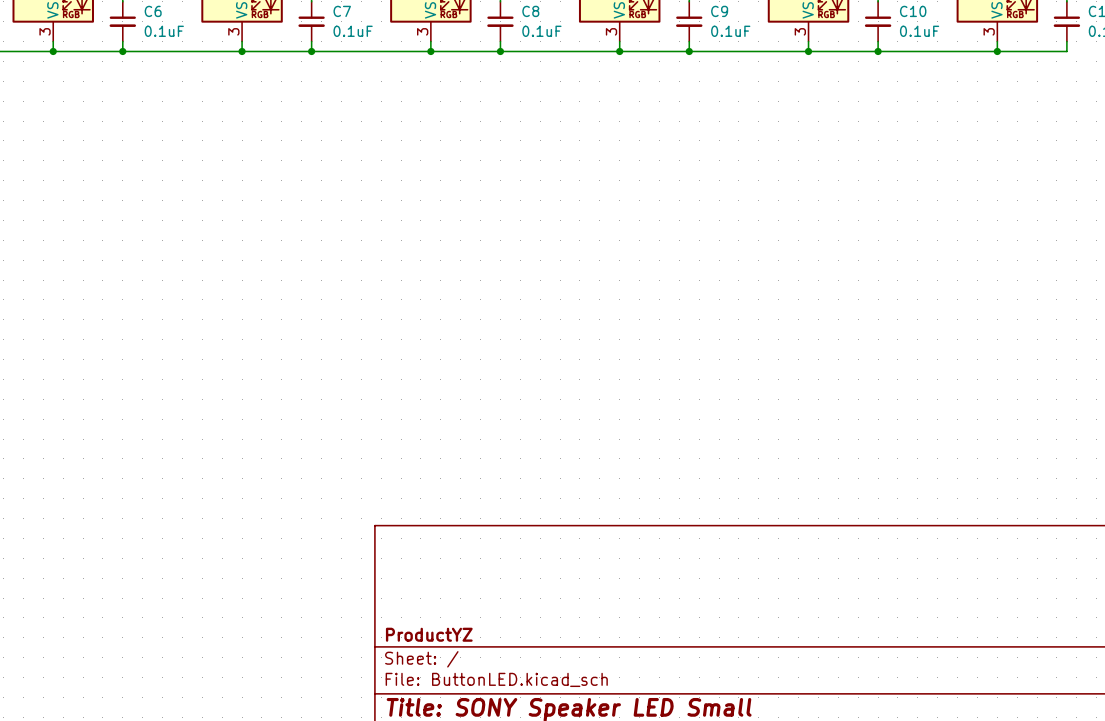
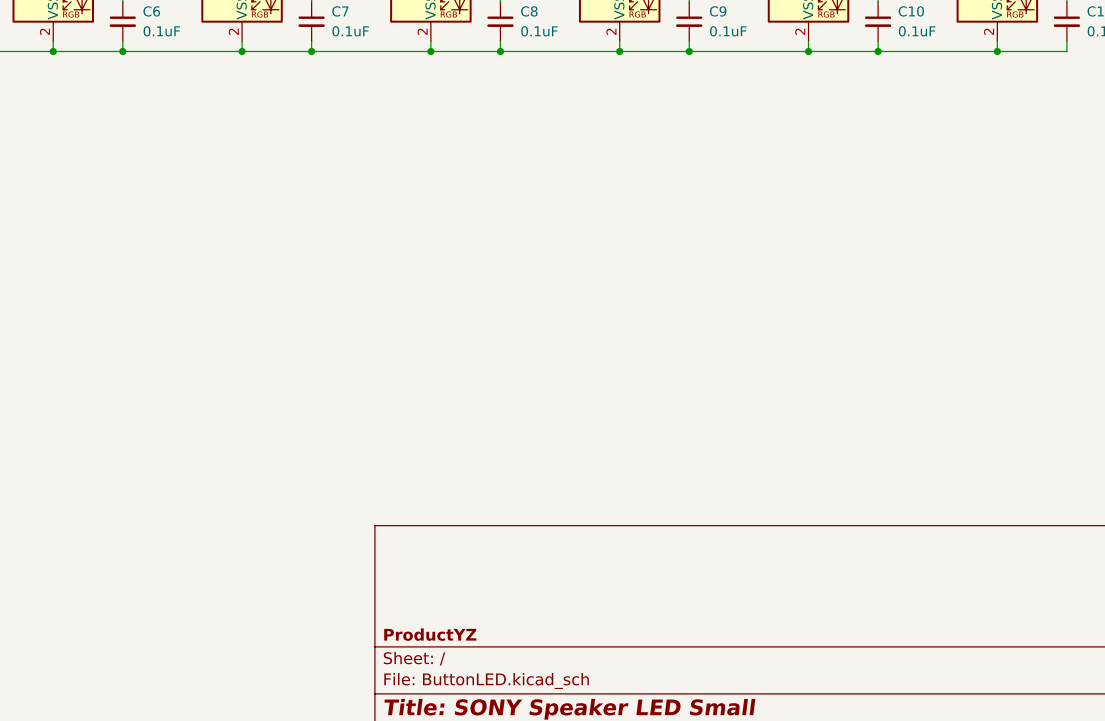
part pin number: 3 (45, 31) -> 2 (44, 31)
part pin number: 3 (233, 31) -> 2 (233, 31)
part pin number: 3 (422, 31) -> 2 (422, 31)
part pin number: 3 (611, 31) -> 2 (611, 31)
part pin number: 3 (800, 31) -> 2 (800, 31)
part pin number: 3 (989, 31) -> 2 (989, 31)

